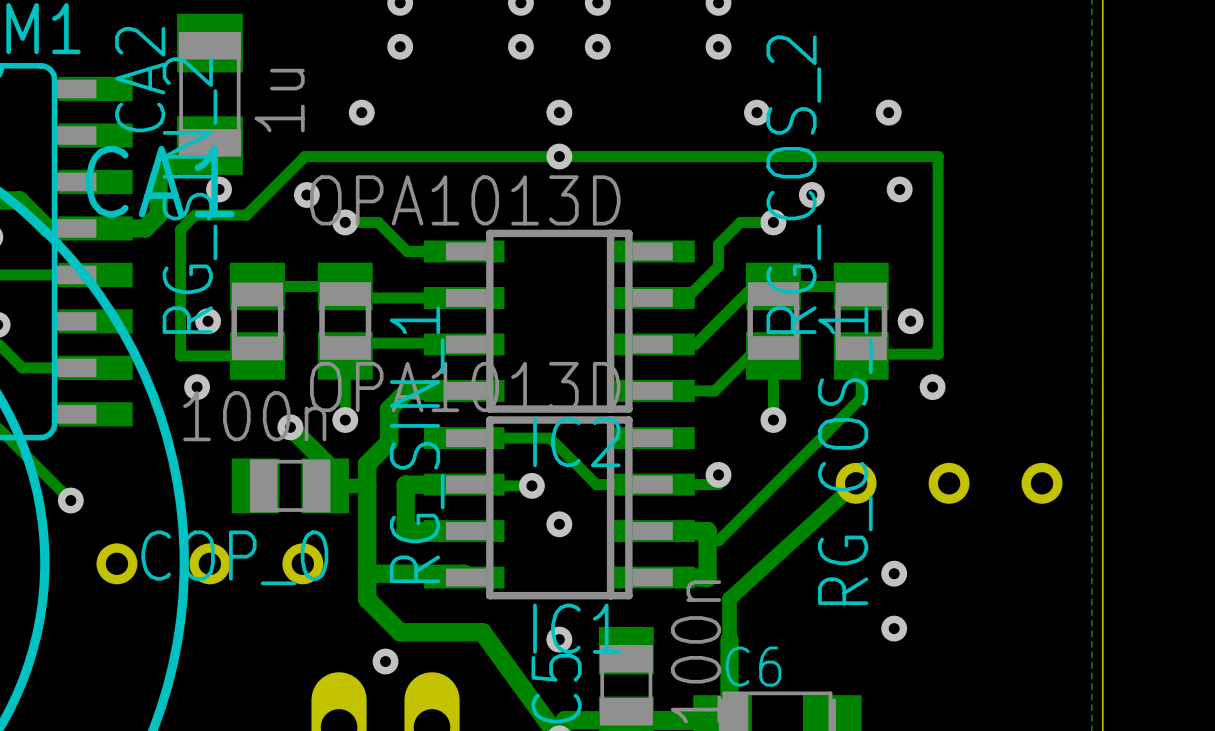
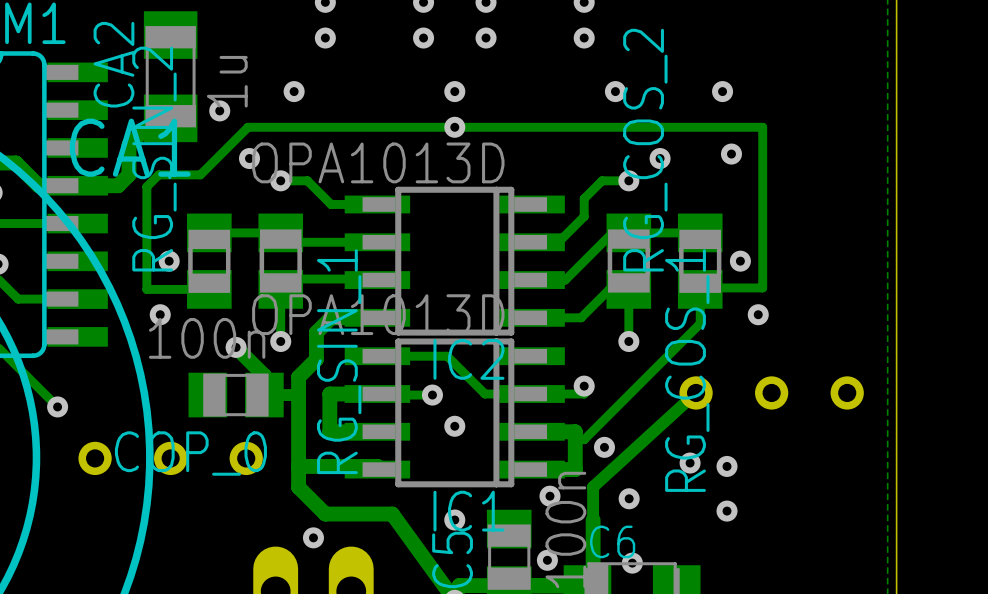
via position: (219, 189) -> (219, 110)
via: none -> (604, 447)
via: none -> (690, 463)
via: none -> (549, 496)
via: none -> (629, 498)
via: none -> (547, 560)
via: none -> (632, 563)

